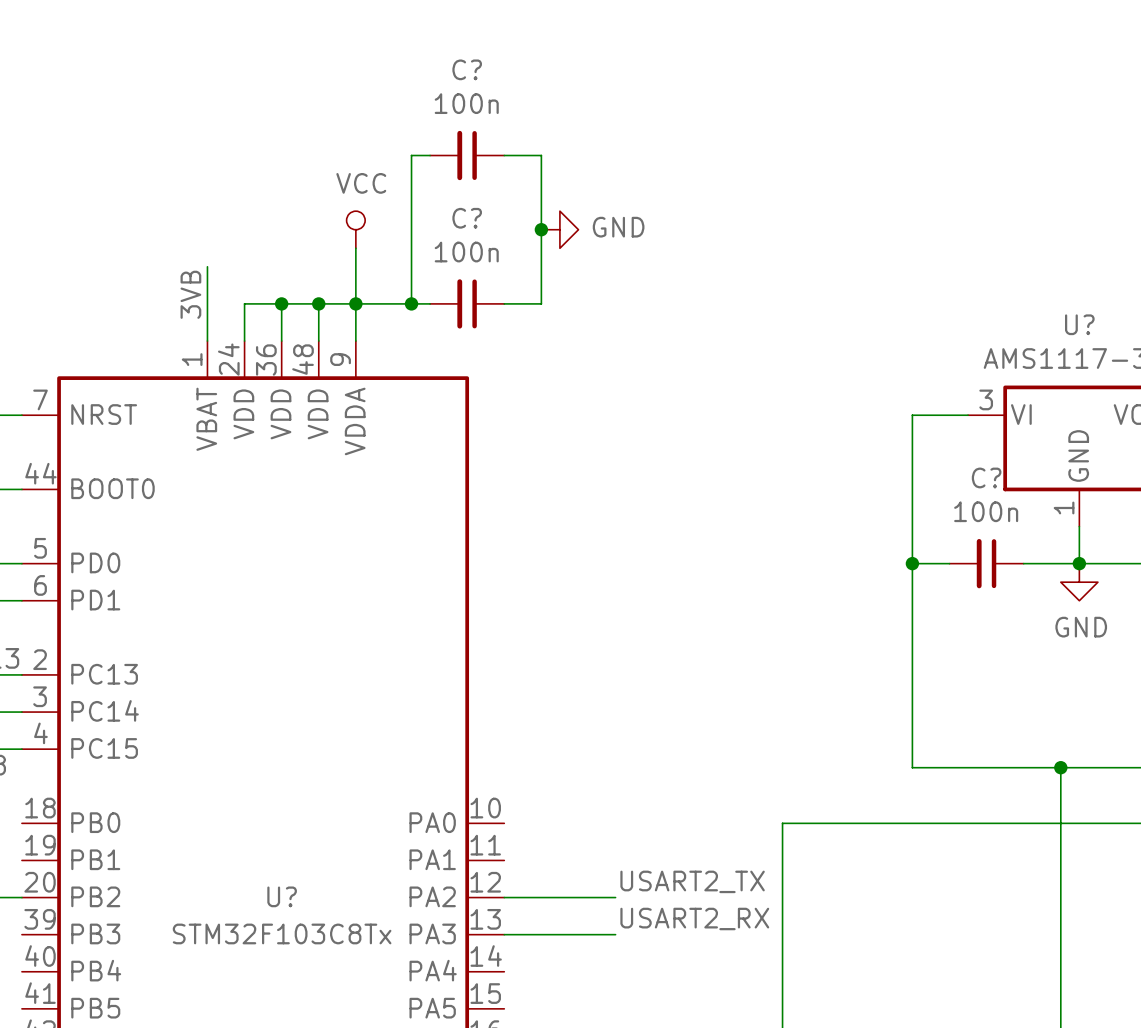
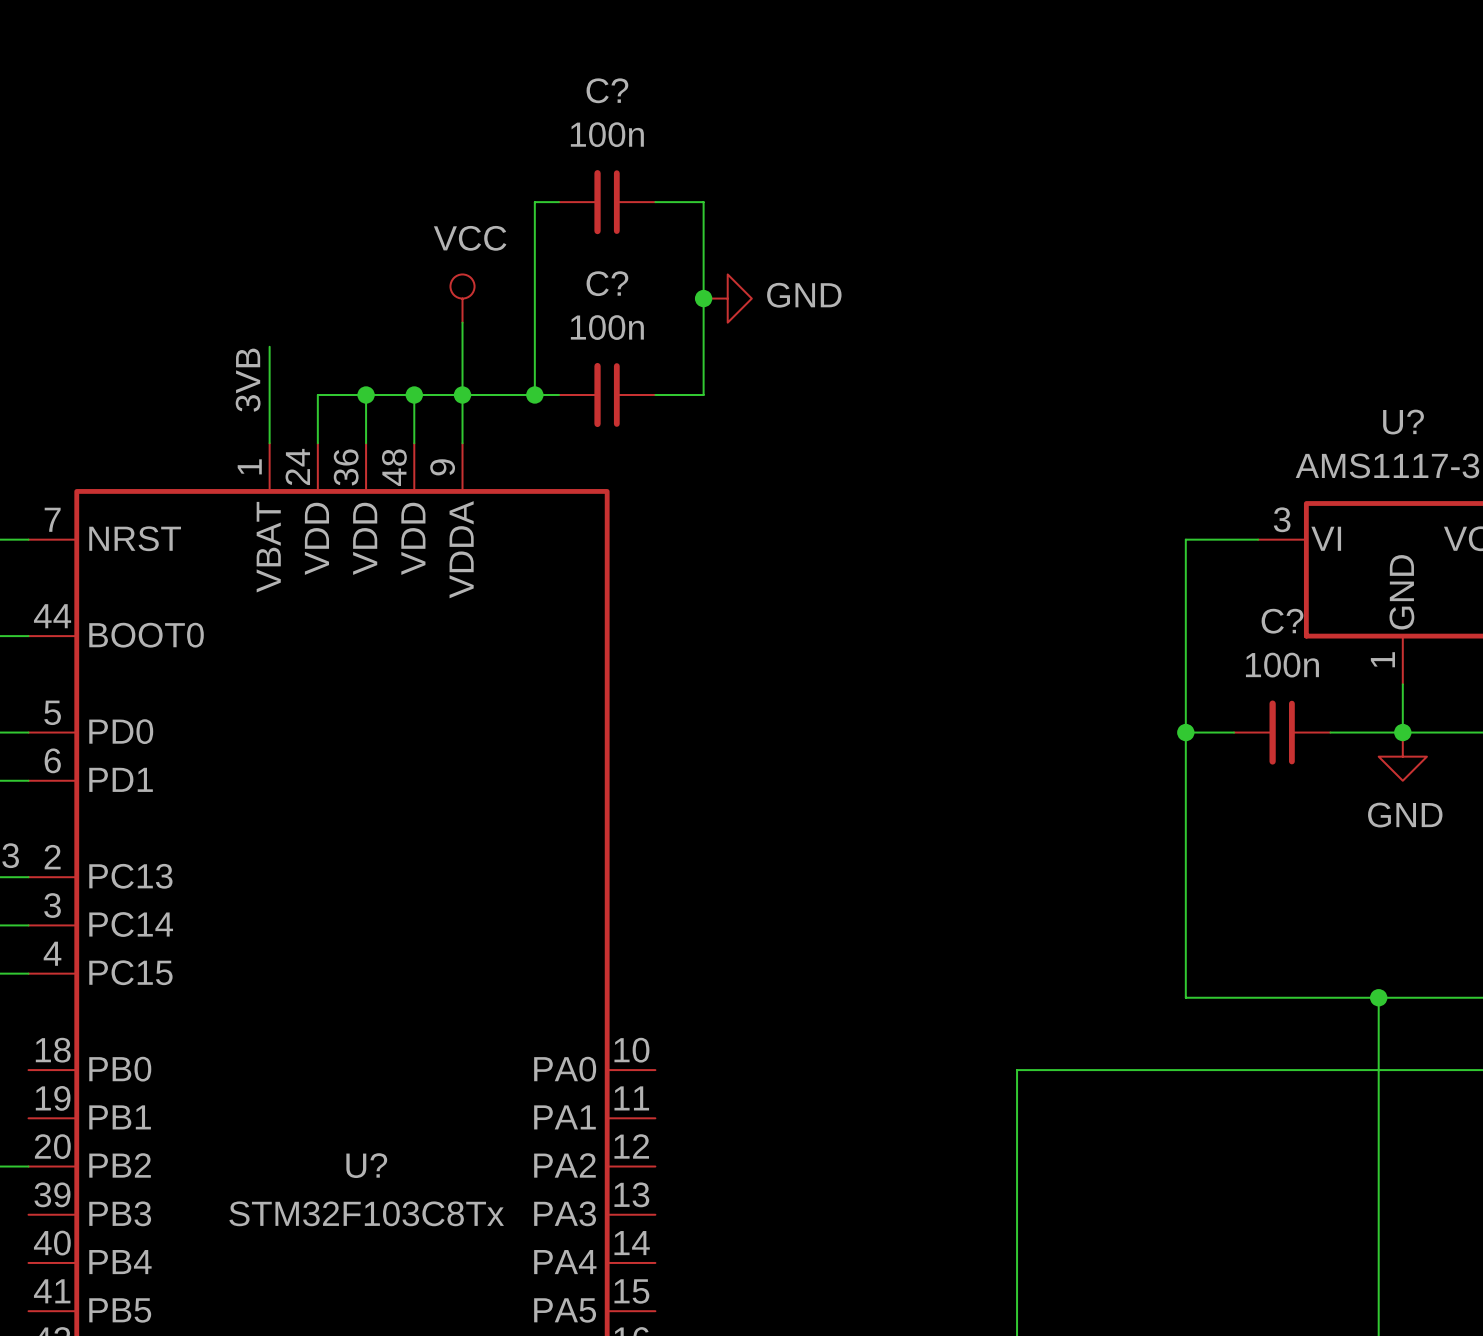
label: USART2_TX (692, 881) -> none
wire: (504, 897) (615, 897) -> none
label: USART2_RX (694, 918) -> none
wire: (504, 934) (615, 934) -> none

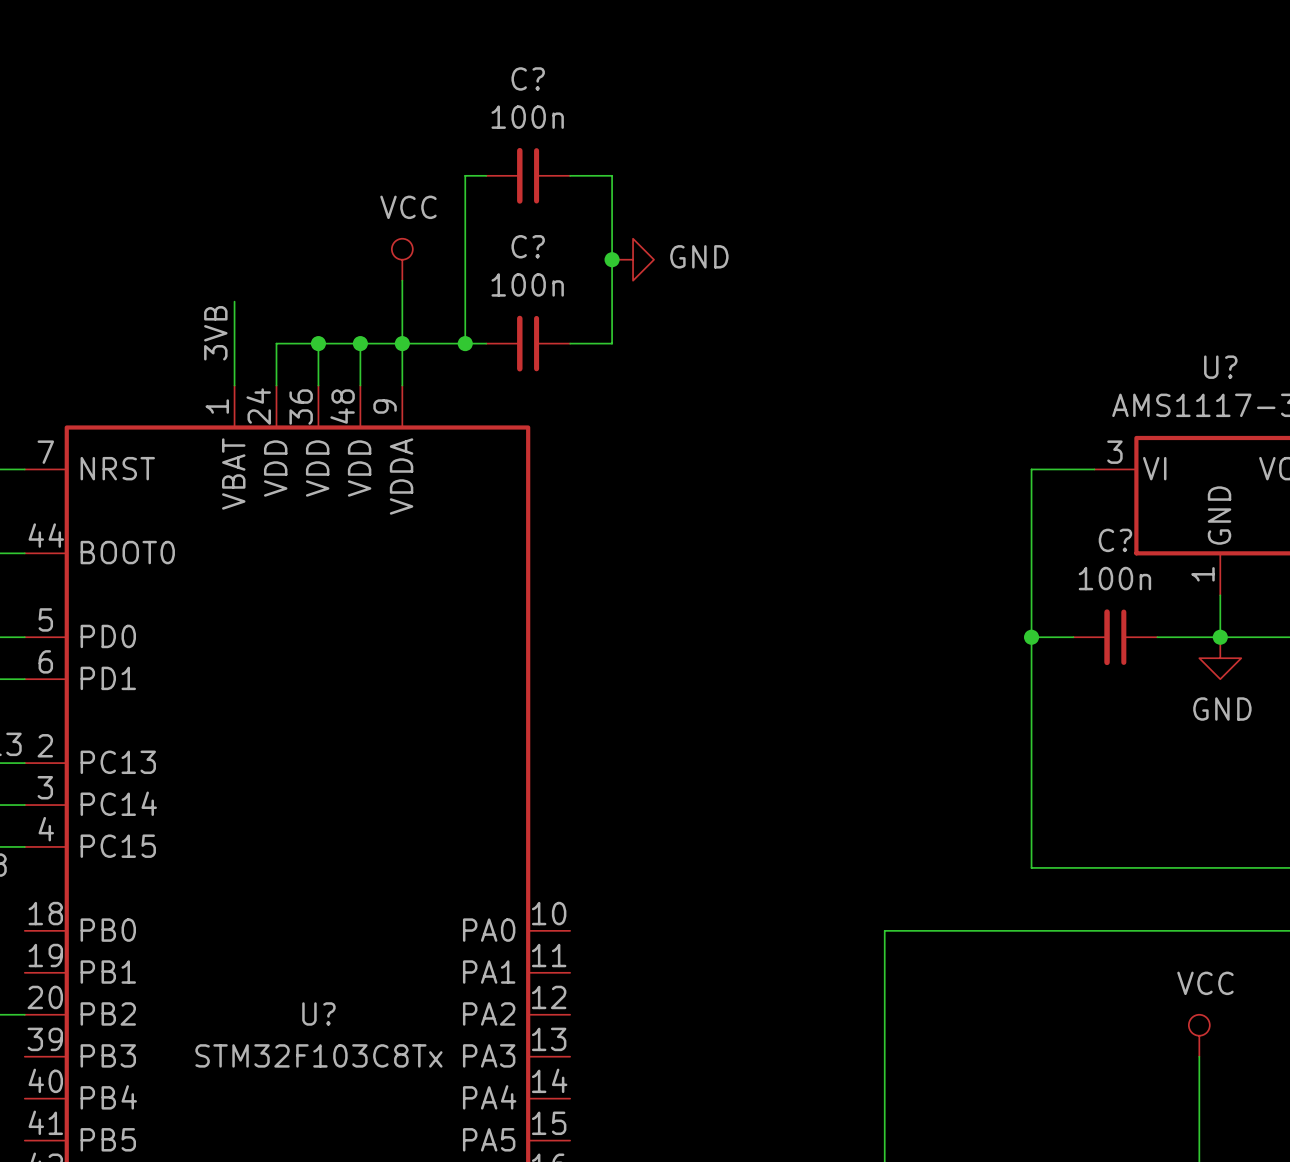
wire: (1378, 997) (1378, 1214) -> none
junction: (1378, 997) -> none
power symbol: none -> VCC (1199, 1035)

